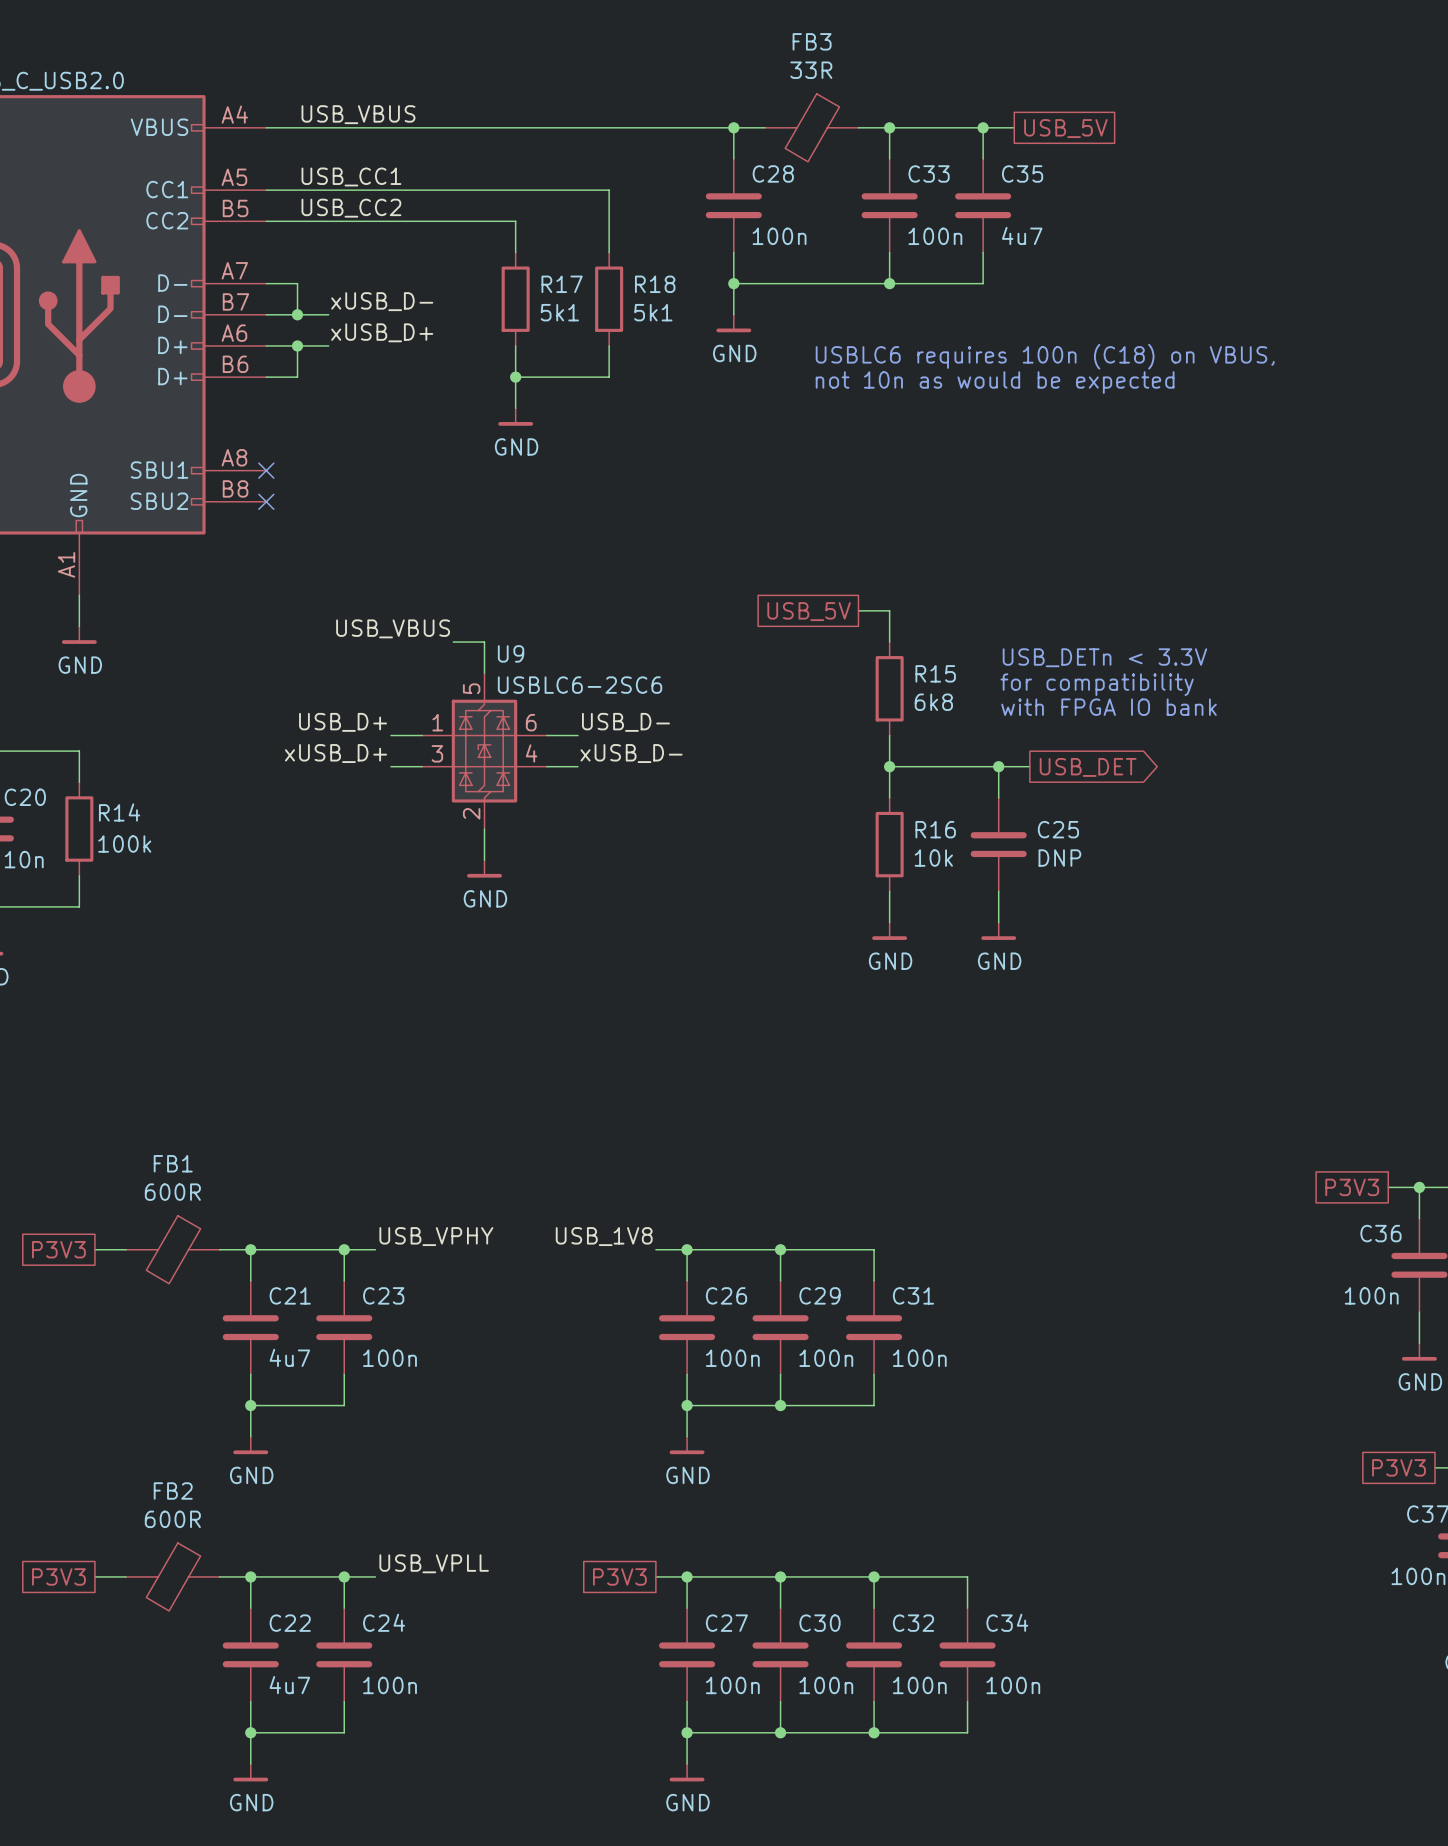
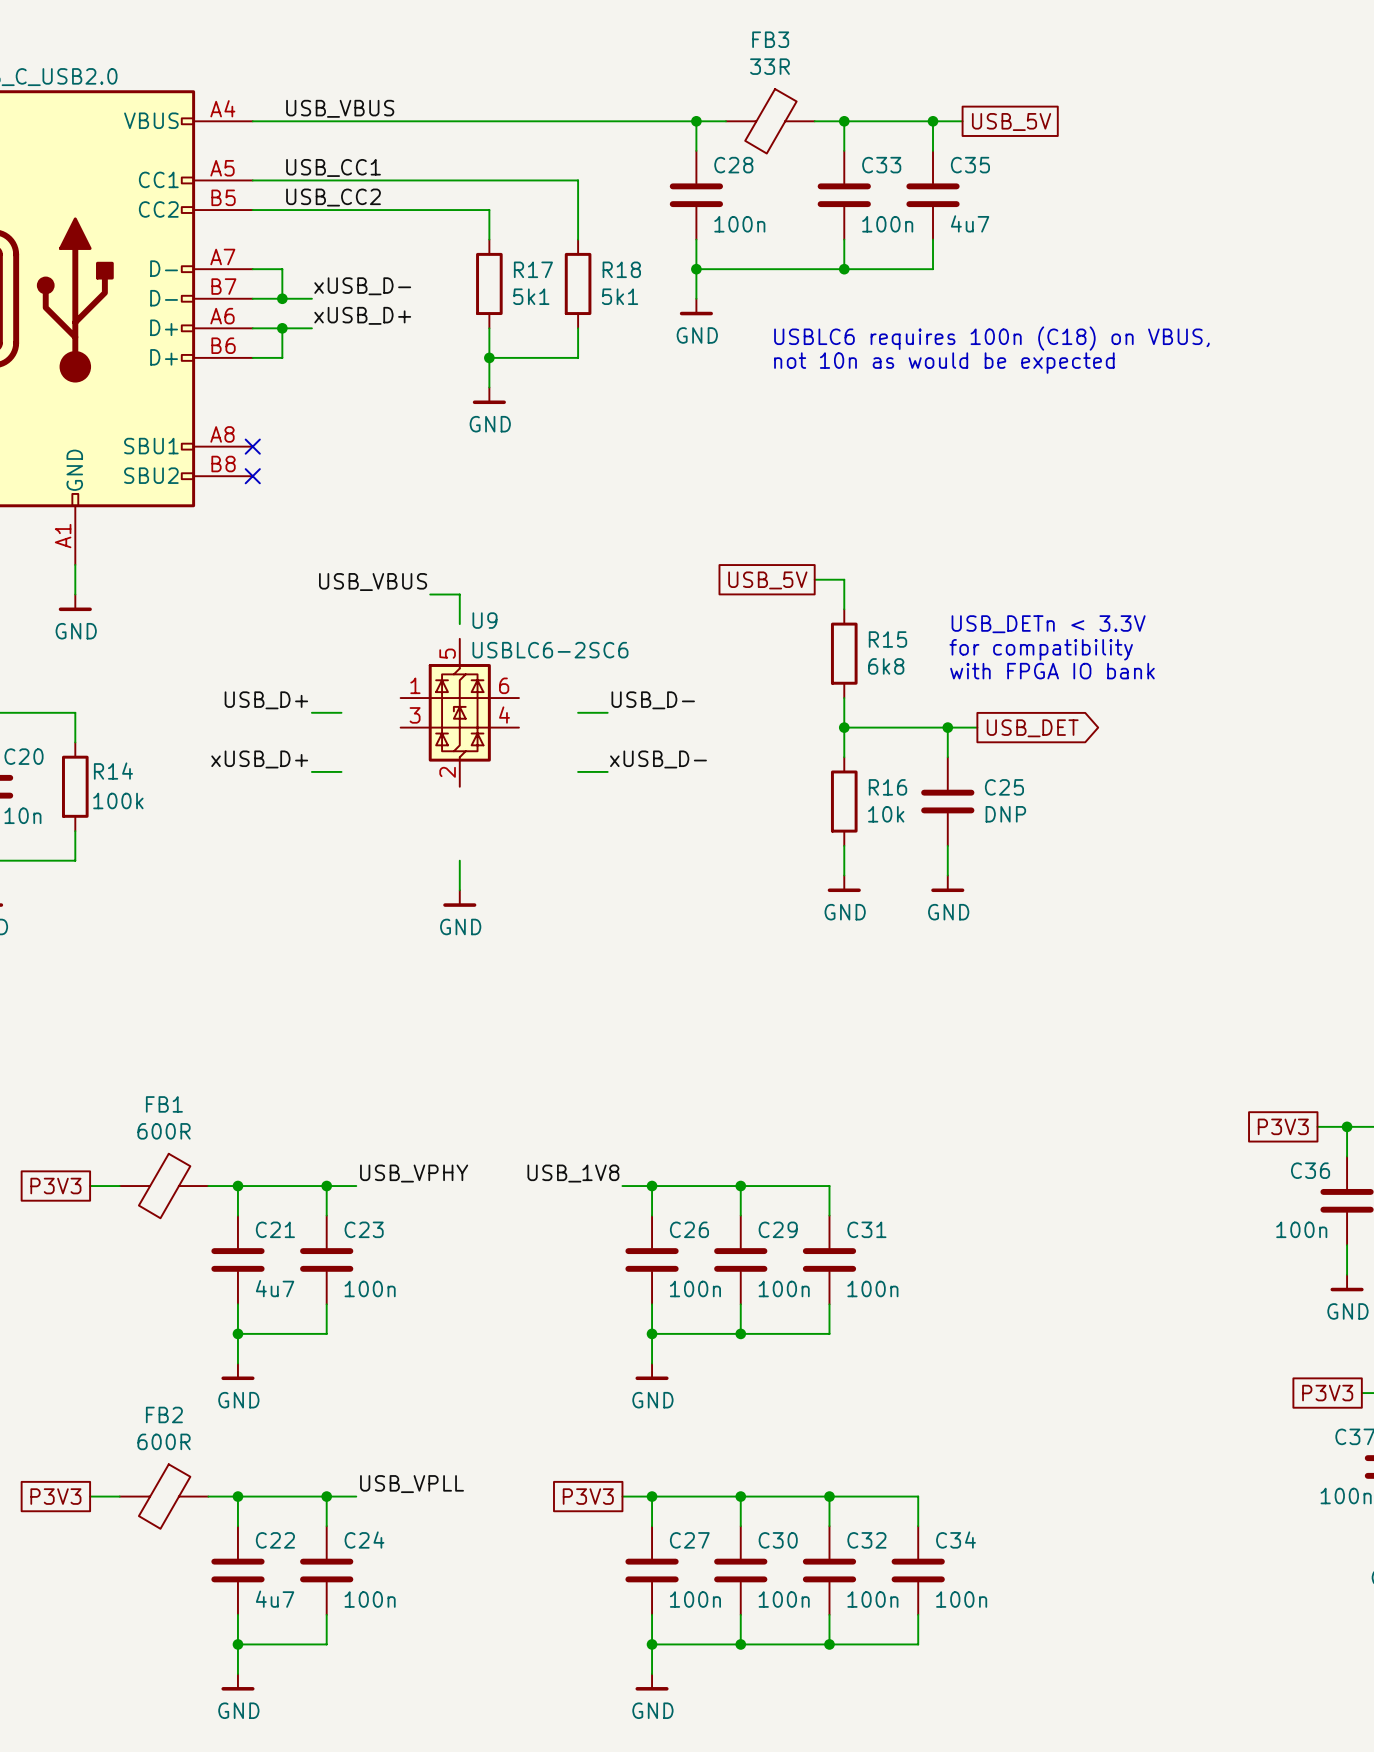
label position: USB_VBUS (393, 628) -> USB_VBUS (373, 582)
wire: (453, 642) (484, 642) -> (430, 594) (459, 594) (459, 609)
wire: (484, 657) (484, 673) -> none
label position: USB_D+ (343, 722) -> USB_D+ (266, 700)
label position: USB_D- (625, 722) -> USB_D- (653, 700)
wire: (391, 735) (422, 735) -> (311, 712) (341, 712)
wire: (546, 735) (577, 735) -> (578, 712) (607, 712)
label position: xUSB_D+ (335, 753) -> xUSB_D+ (259, 759)
label position: xUSB_D- (631, 753) -> xUSB_D- (658, 759)
wire: (391, 766) (422, 766) -> (311, 771) (341, 771)
wire: (546, 766) (577, 766) -> (578, 771) (607, 771)
wire: (484, 829) (484, 860) -> (459, 860) (459, 890)
power symbol position: GND (484, 868) -> GND (459, 898)

